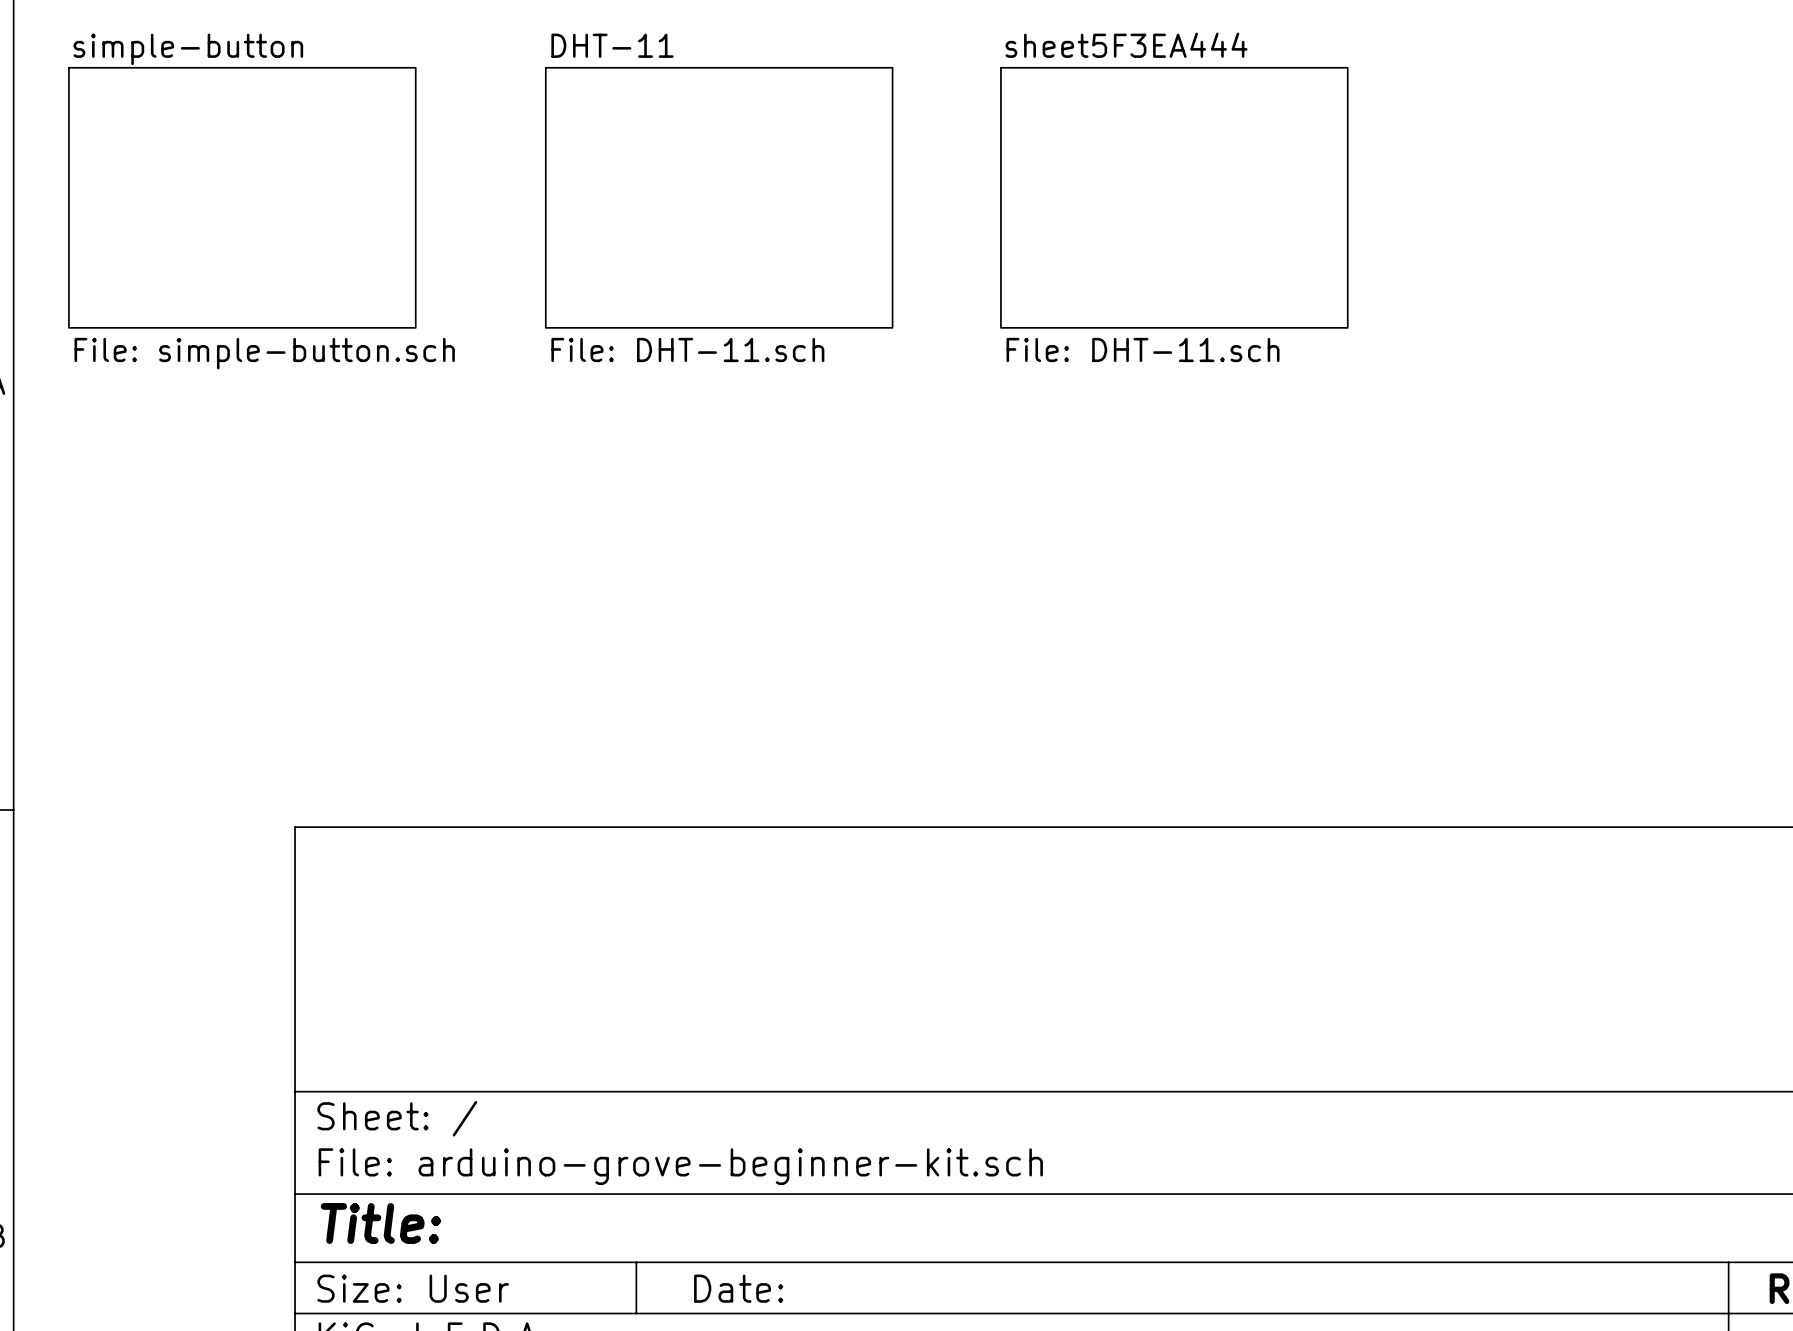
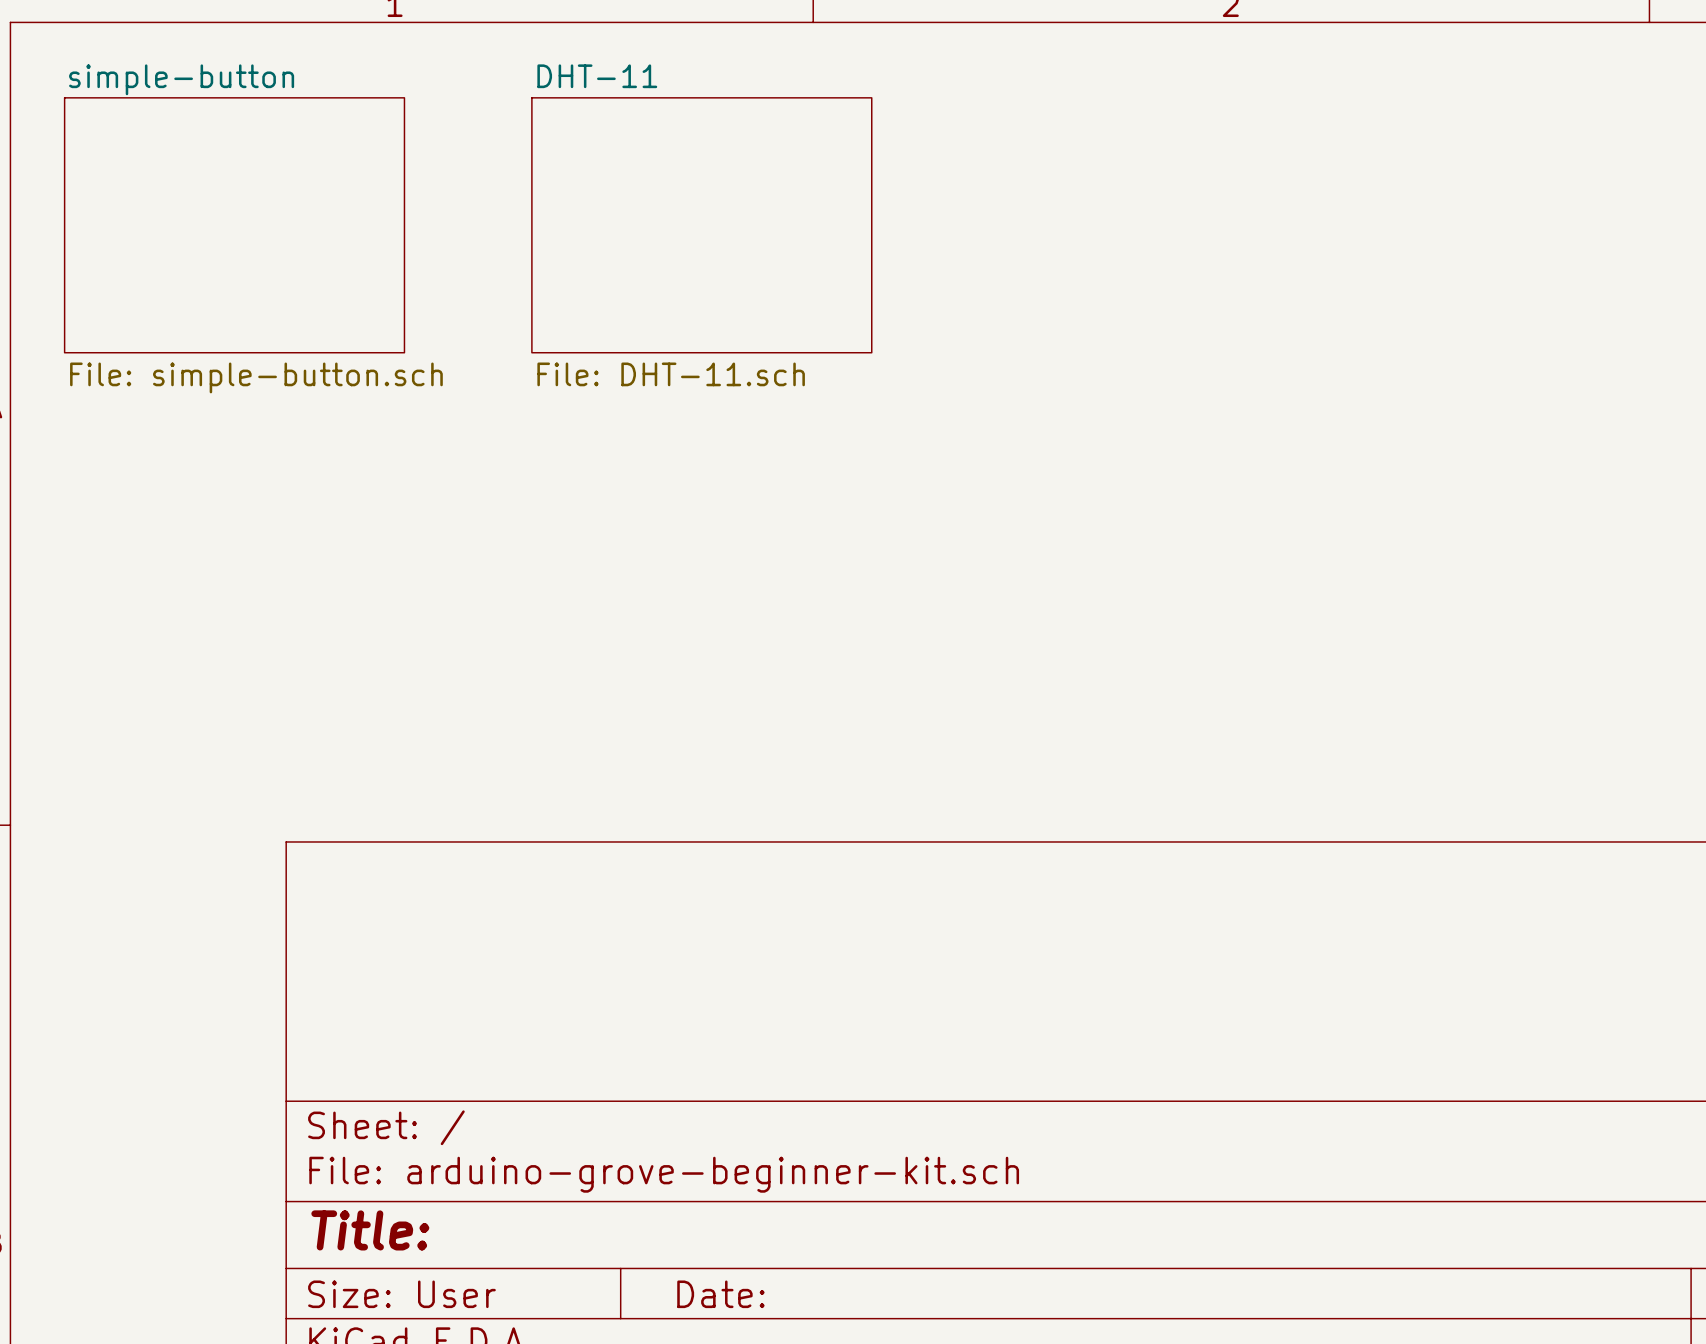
sheet sheet5F3EA444: File: DHT-11.sch (1174, 197) -> none

